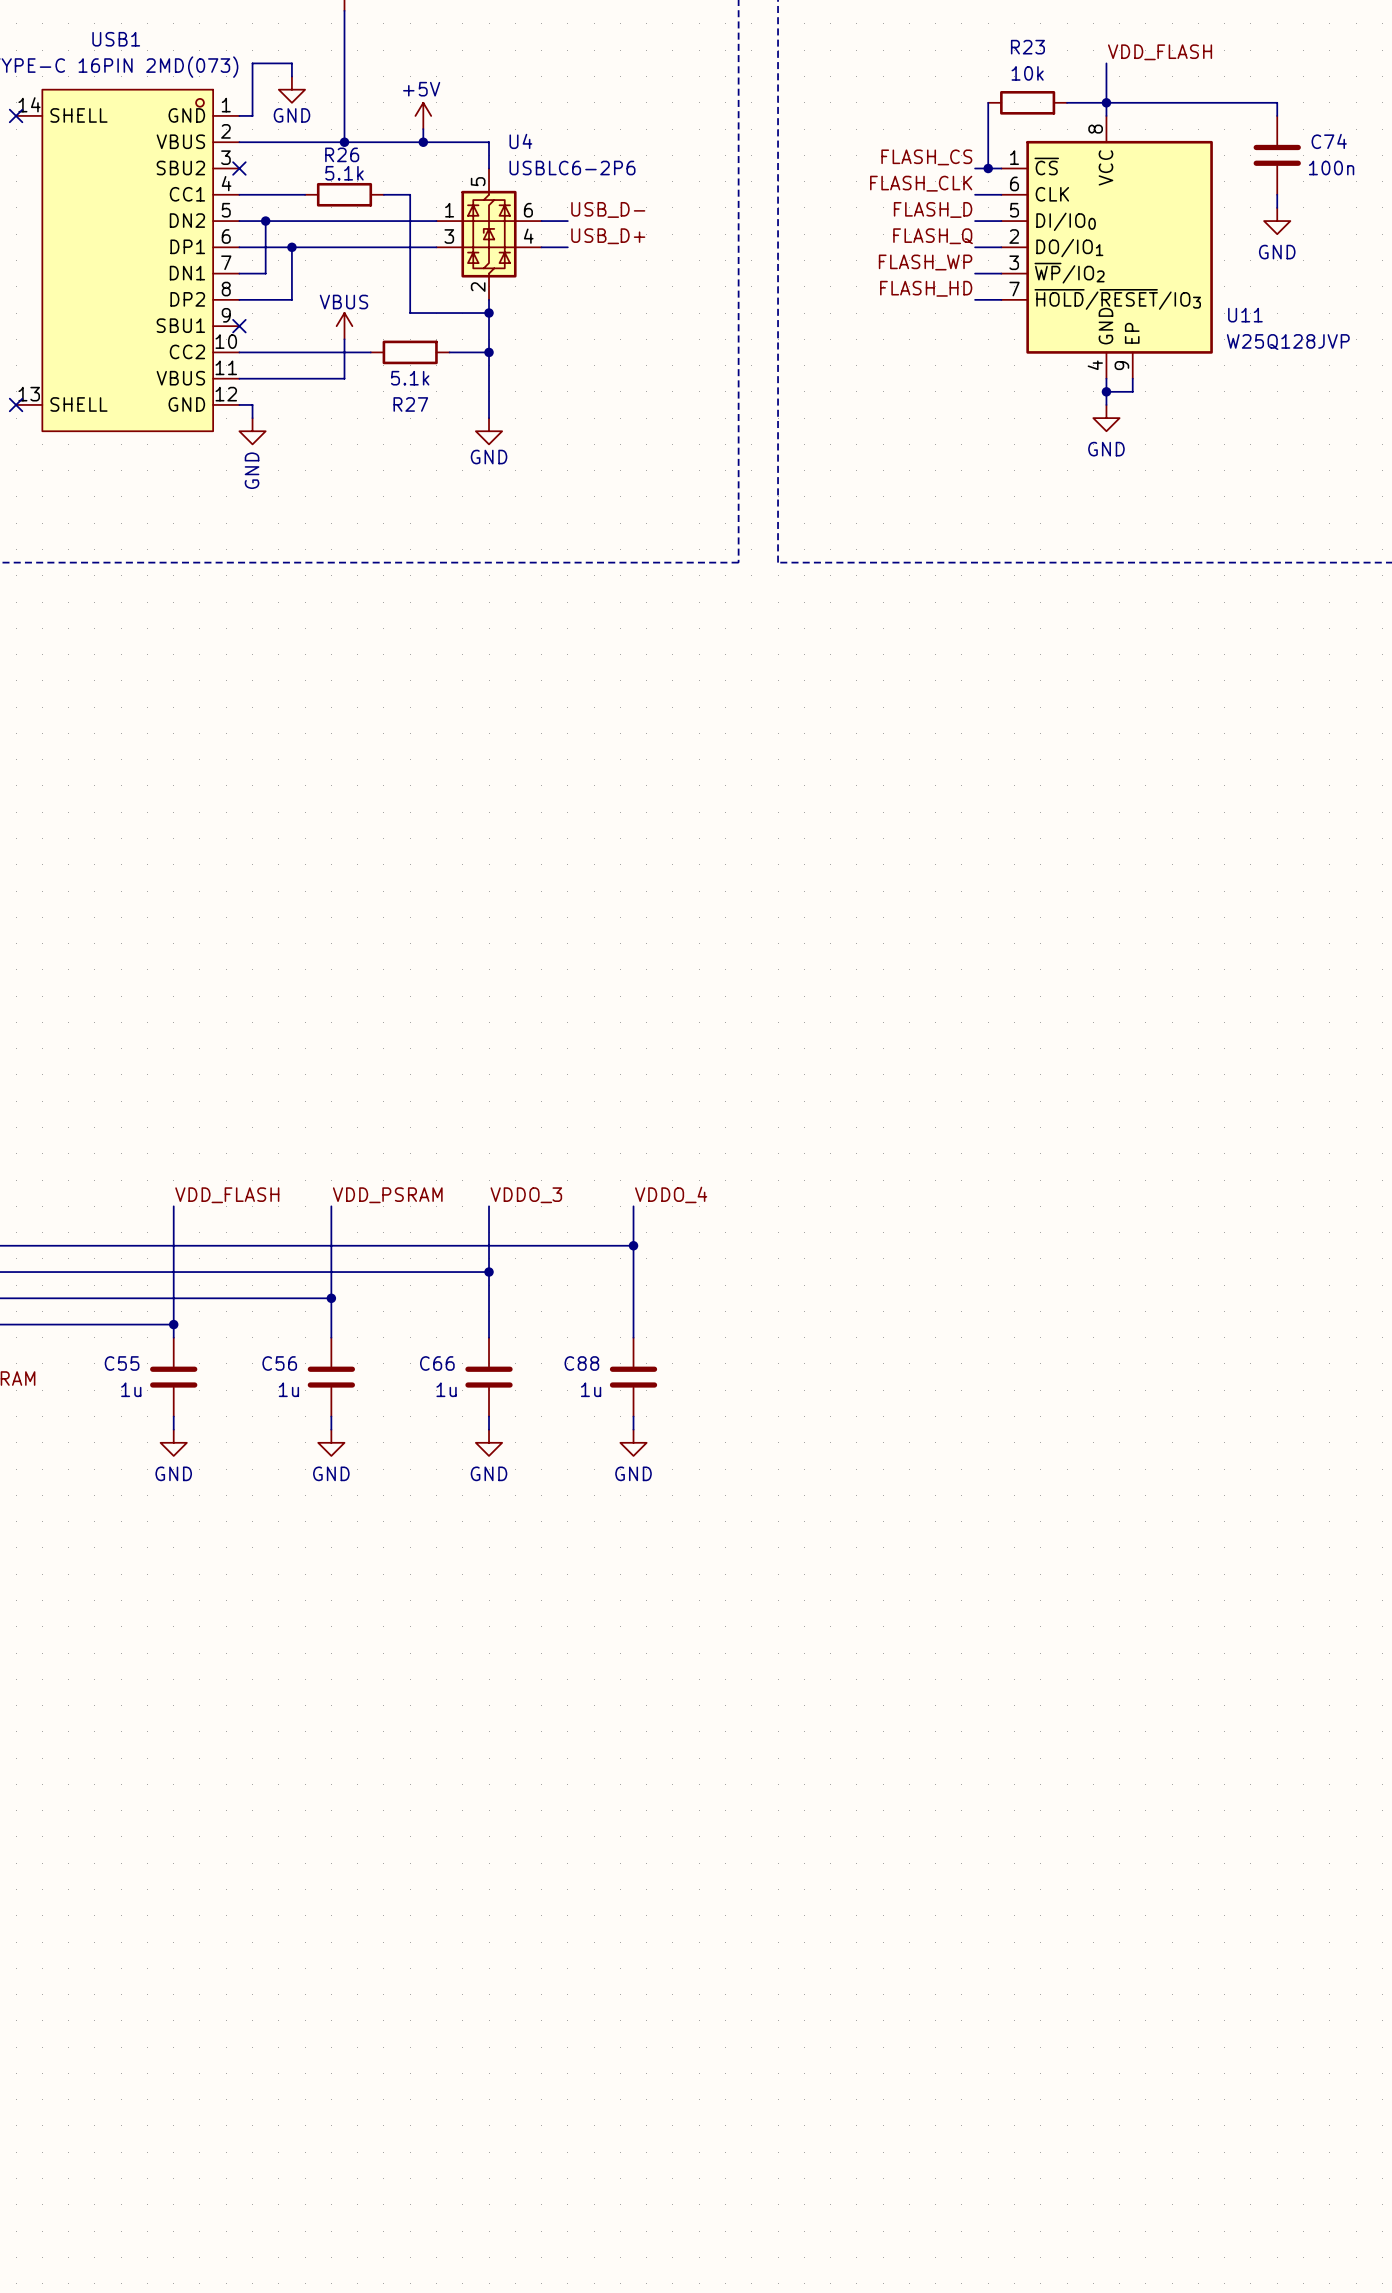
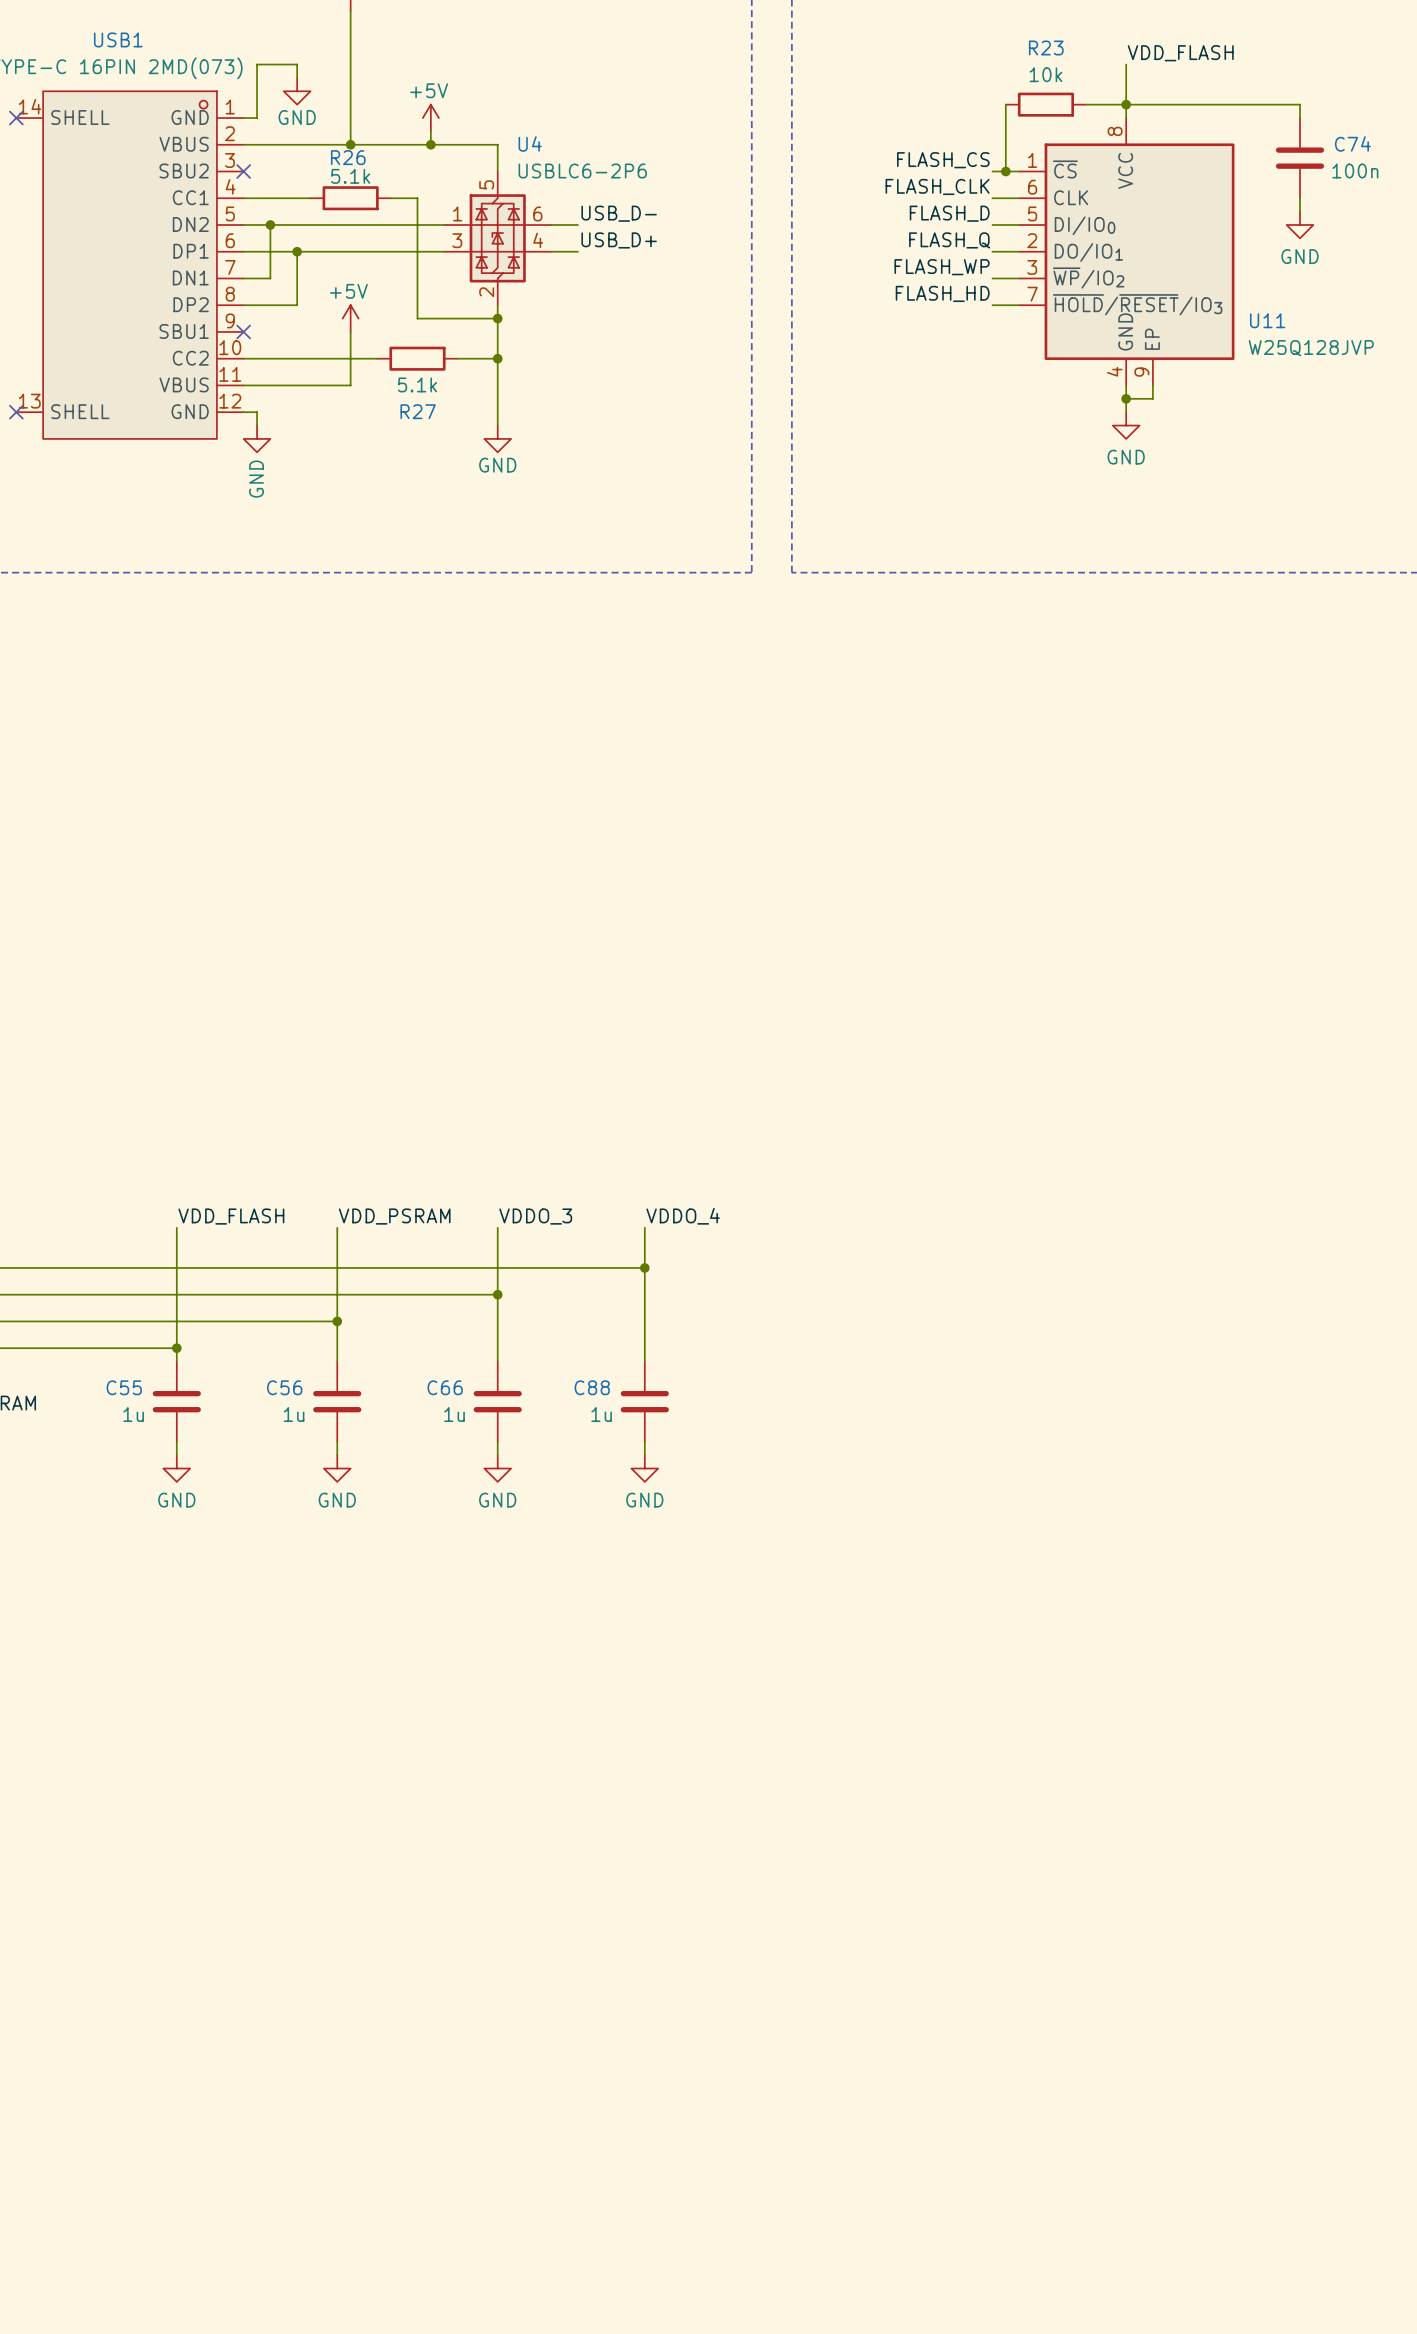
power symbol: none -> +5V (350, 318)
power symbol: VBUS (344, 326) -> none

